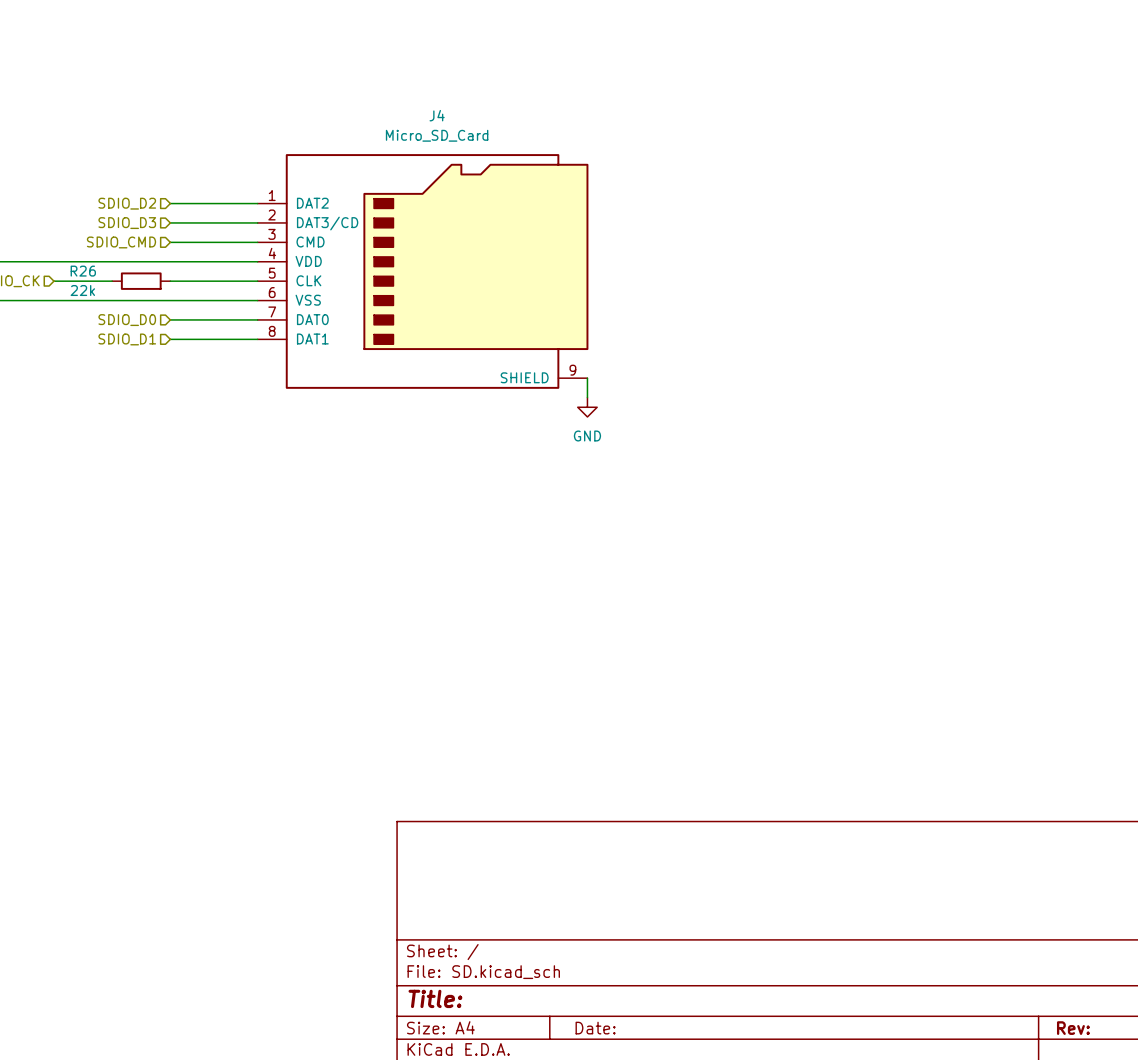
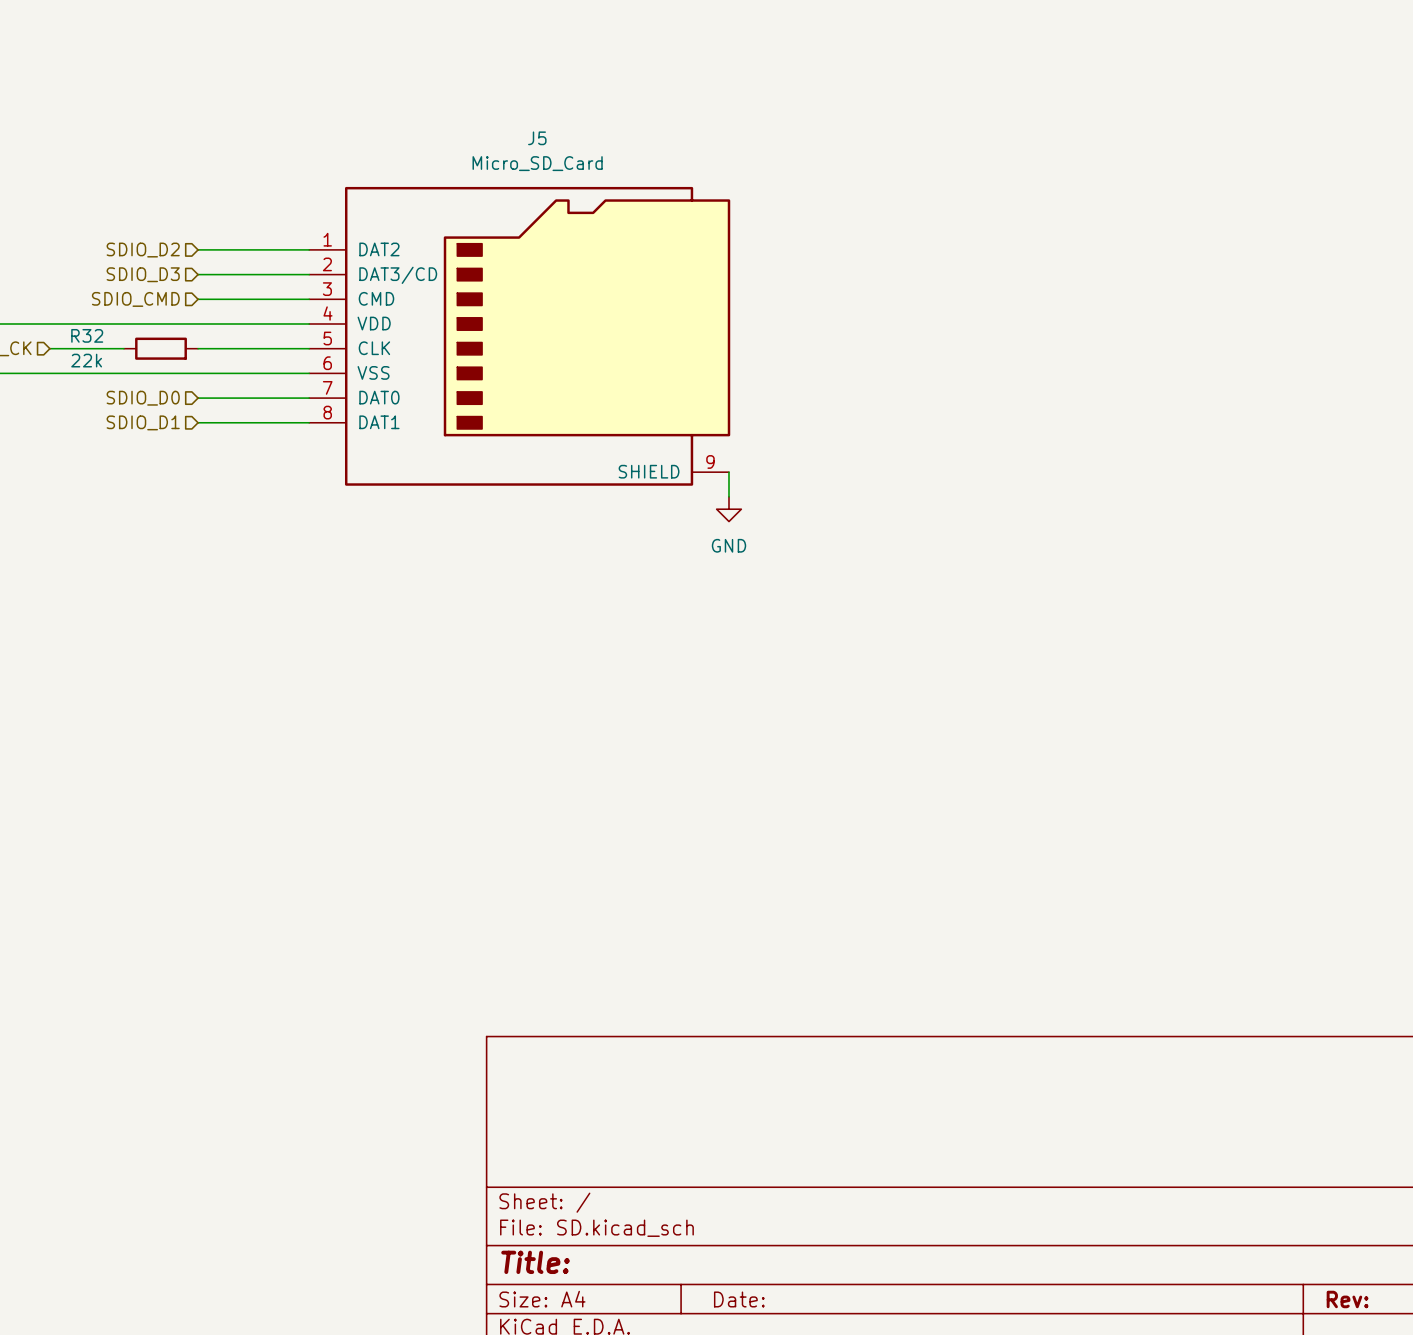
J4 name: J4 (437, 115) -> J5 (537, 138)
R26 name: R26 (83, 271) -> R32 (87, 335)

